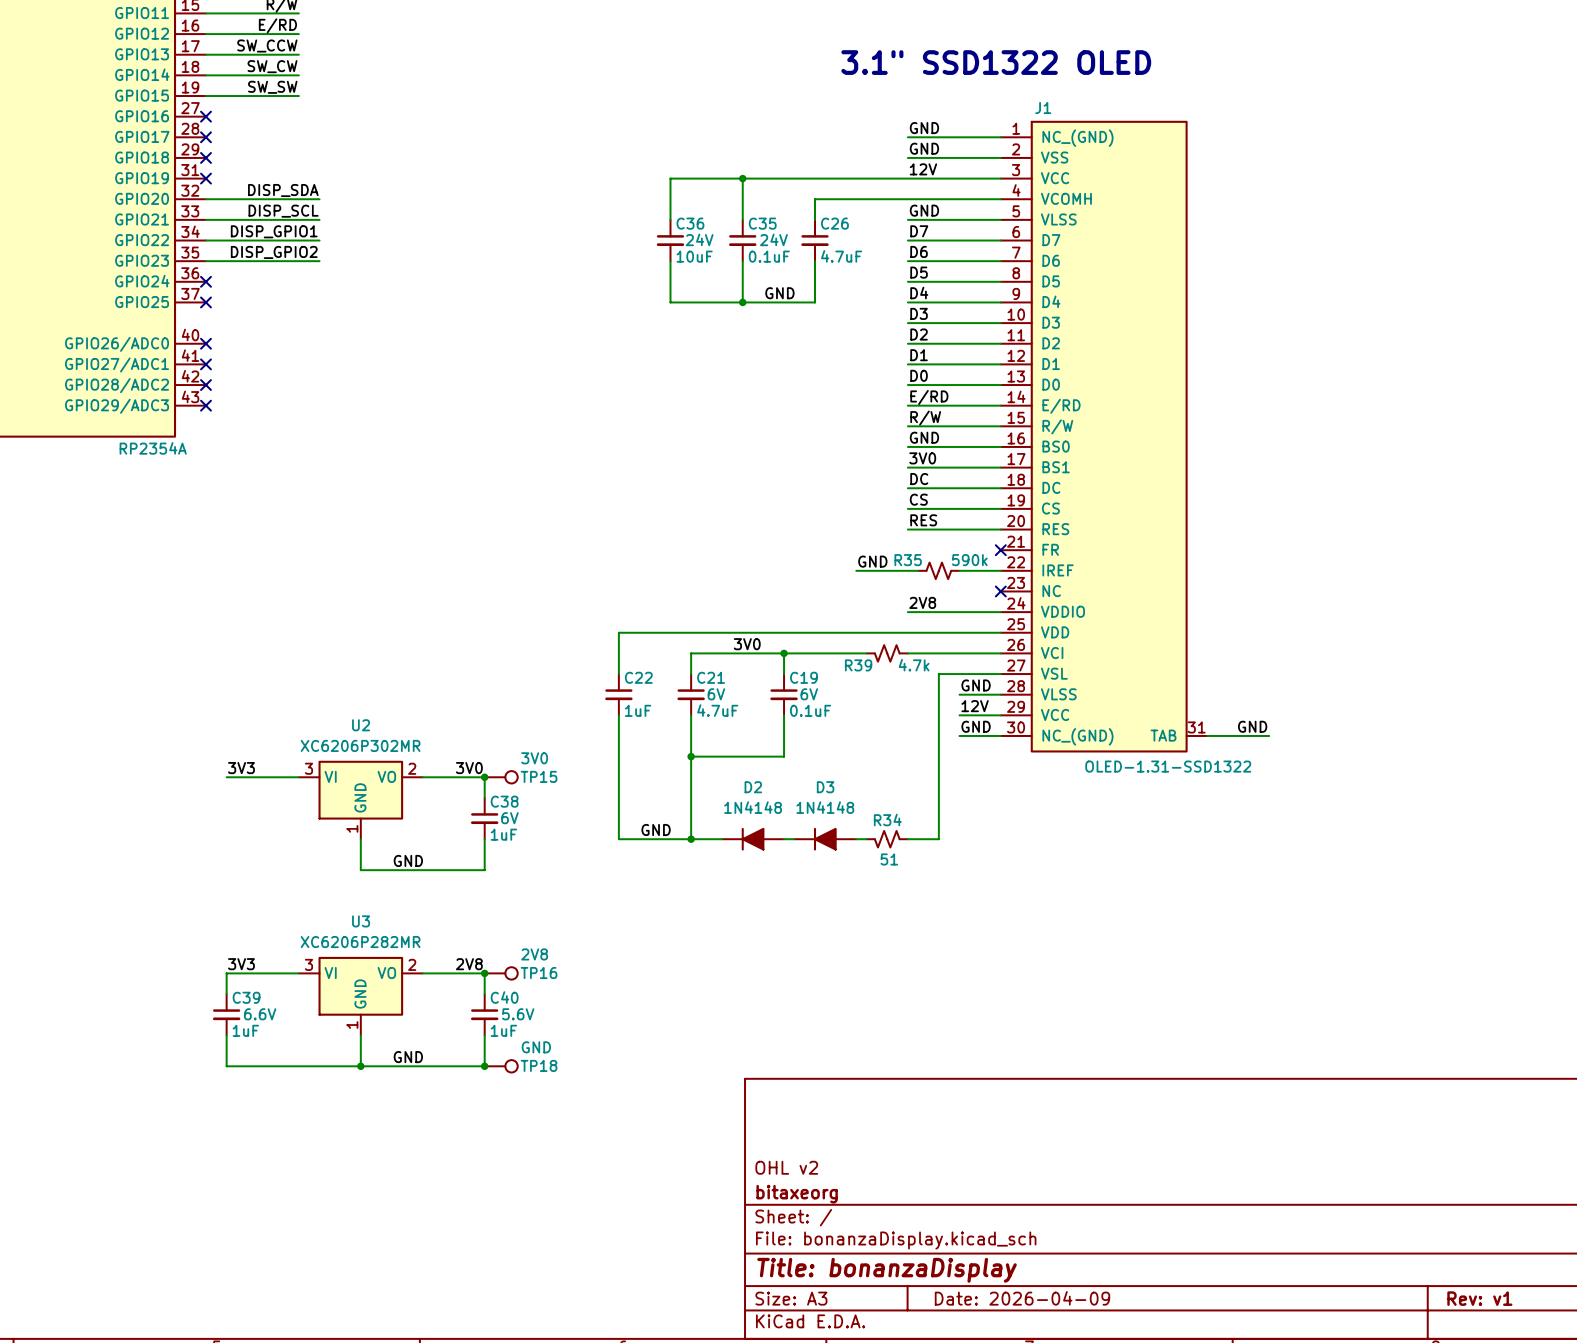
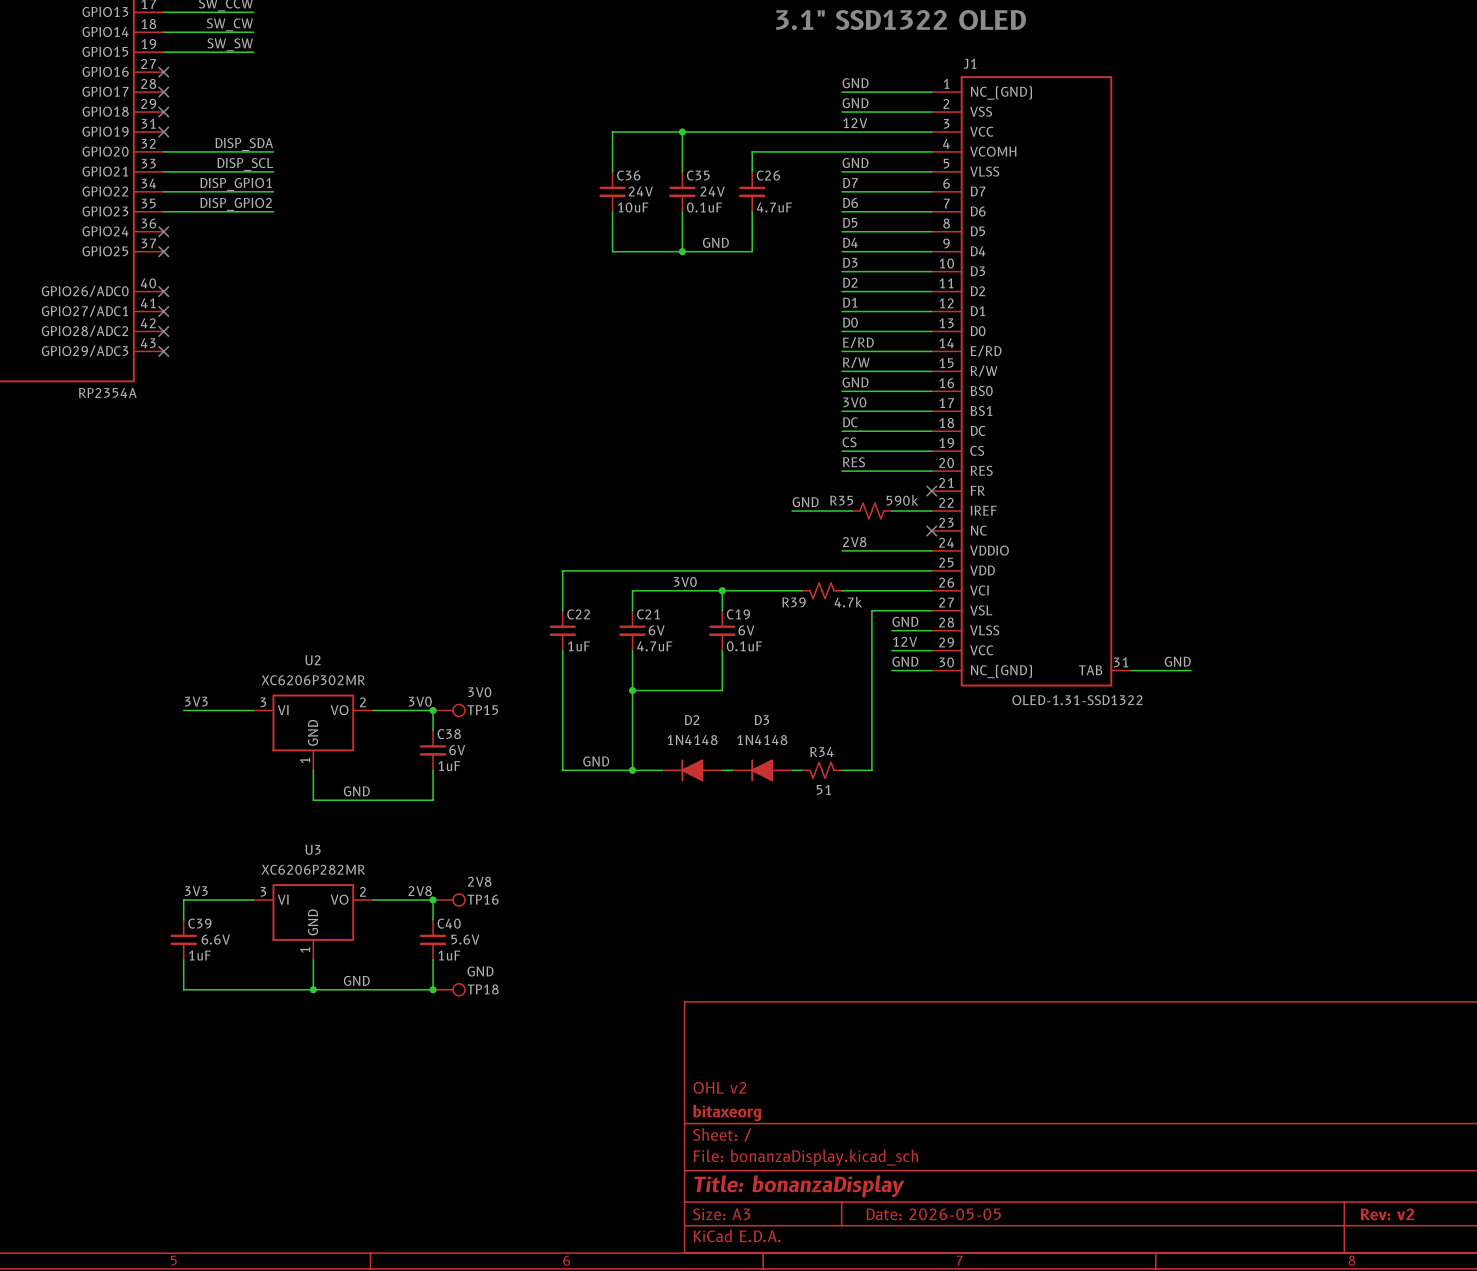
title block: Date: 2026-04-09 (1022, 1298) -> Date: 2026-05-05 (933, 1214)
title block: Rev: v1 (1479, 1298) -> Rev: v2 (1387, 1214)

